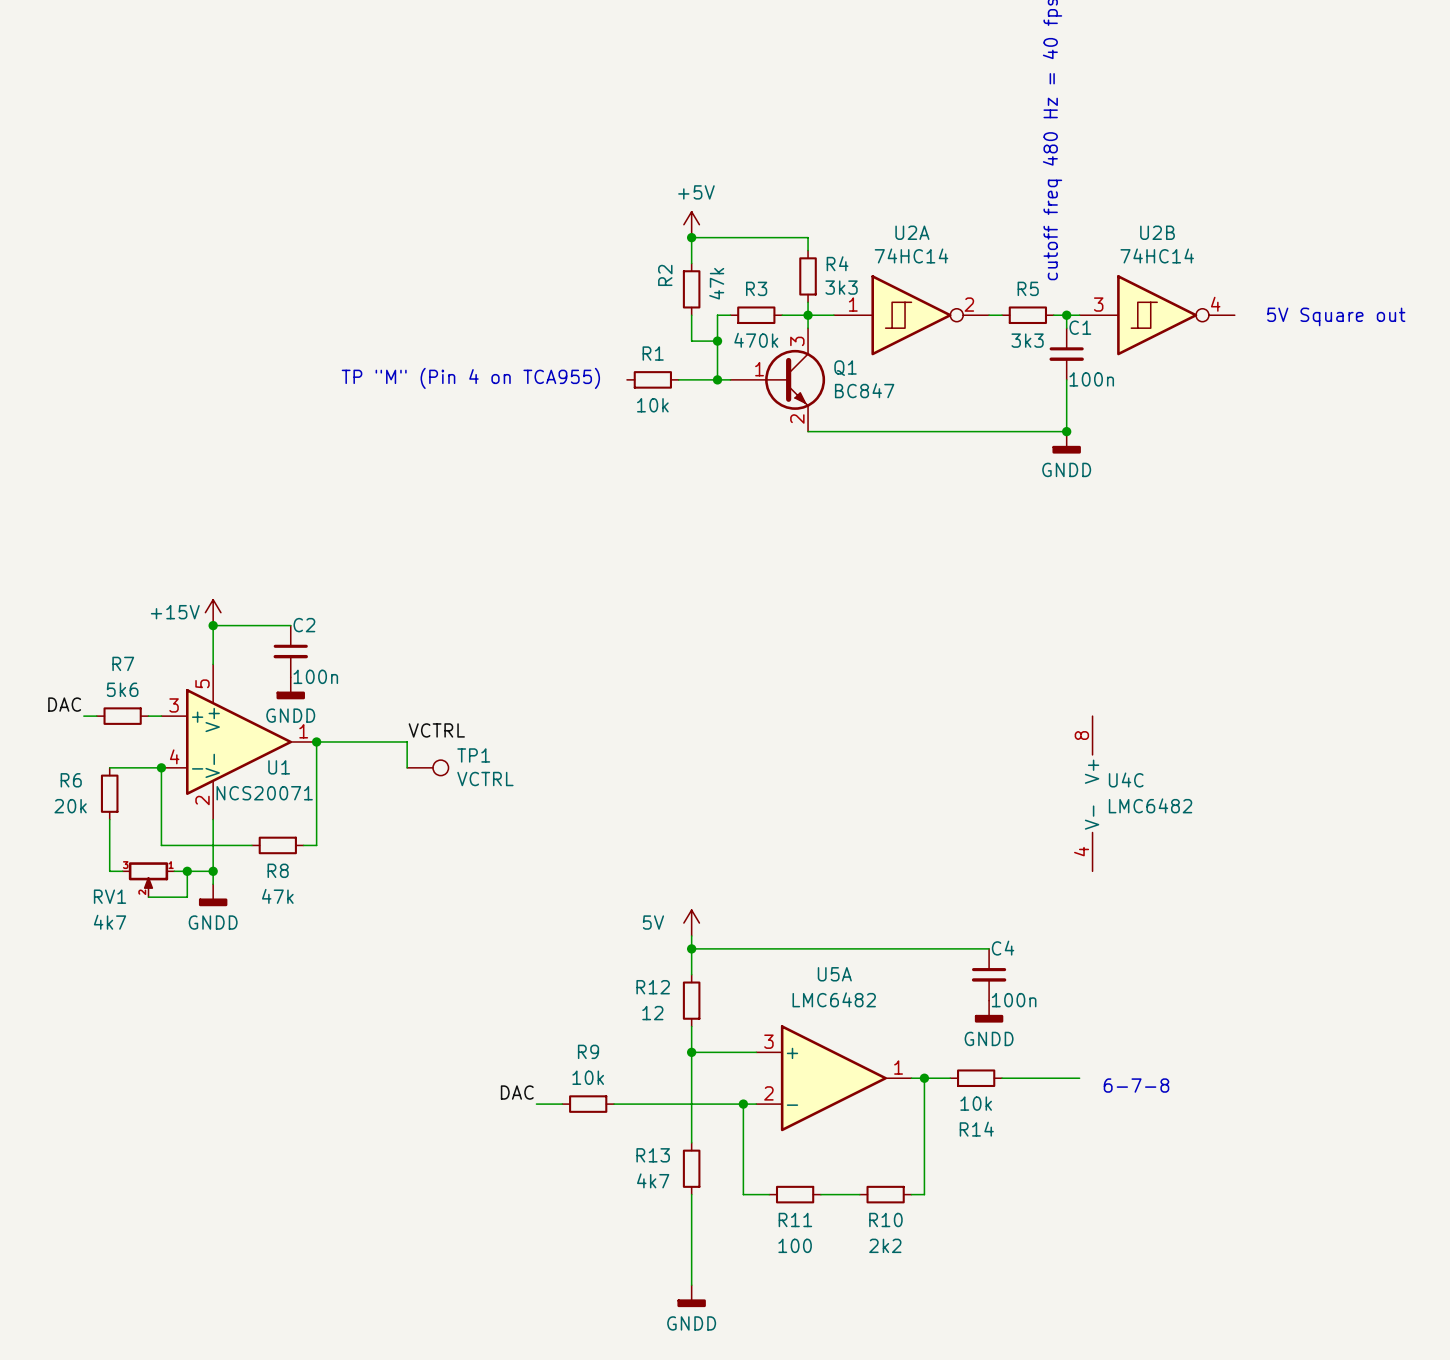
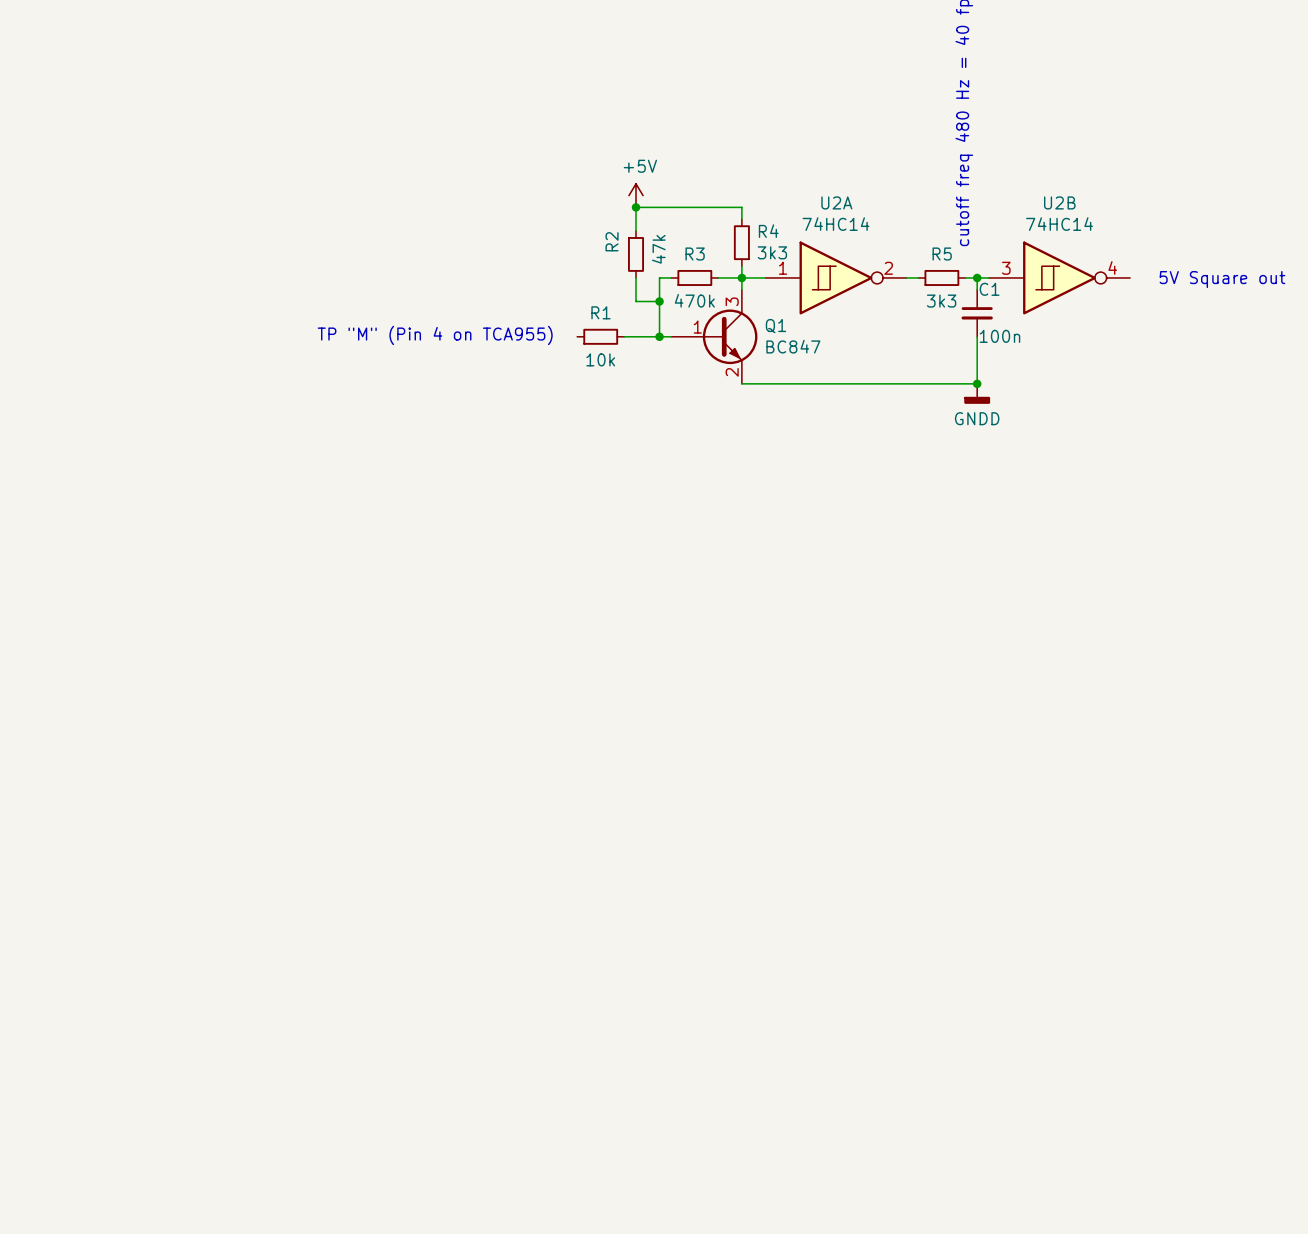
power symbol: +15V (213, 612) -> none
junction: (213, 625) -> none
wire: (290, 625) (213, 625) (213, 664) -> none
C2: 100n (290, 651) -> none
power symbol: GNDD (290, 688) -> none
label: DAC (64, 704) -> none
wire: (83, 716) (96, 716) -> none
R7: 5k6 (122, 716) -> none
wire: (148, 716) (161, 716) -> none
label: VCTRL (436, 730) -> none
U1: NCS20071 (239, 741) -> none
junction: (316, 741) -> none
wire: (109, 767) (161, 767) (161, 845) (251, 845) -> none
junction: (161, 767) -> none
wire: (407, 767) (407, 741) (316, 741) (316, 845) (303, 845) -> none
TP1: VCTRL (427, 767) -> none
R6: 20k (109, 793) -> none
U4C: LMC6482 (1092, 793) -> none
wire: (109, 819) (109, 871) (122, 871) -> none
wire: (213, 819) (213, 884) -> none
R8: 47k (277, 845) -> none
wire: (174, 871) (213, 871) -> none
wire: (187, 871) (187, 897) (148, 897) -> none
junction: (187, 871) -> none
junction: (213, 871) -> none
RV1: 4k7 (148, 879) -> none
power symbol: GNDD (213, 895) -> none
power symbol: 5V (691, 923) -> none
wire: (691, 935) (691, 974) -> none
wire: (691, 948) (989, 948) -> none
junction: (691, 948) -> none
C4: 100n (989, 974) -> none
R12: 12 (691, 1000) -> none
power symbol: GNDD (989, 1011) -> none
wire: (691, 1026) (691, 1142) -> none
wire: (691, 1052) (756, 1052) -> none
junction: (691, 1052) -> none
U5A: LMC6482 (833, 1078) -> none
wire: (911, 1078) (950, 1078) -> none
wire: (924, 1078) (924, 1194) (911, 1194) -> none
junction: (924, 1078) -> none
R14: 10k (976, 1078) -> none
wire: (1002, 1078) (1079, 1078) -> none
text: 6-7-8 (1136, 1085) -> none
label: DAC (517, 1092) -> none
wire: (536, 1104) (562, 1104) -> none
R9: 10k (588, 1104) -> none
wire: (614, 1104) (756, 1104) -> none
wire: (743, 1104) (743, 1194) (769, 1194) -> none
junction: (743, 1104) -> none
R13: 4k7 (691, 1168) -> none
wire: (691, 1194) (691, 1285) -> none
R11: 100 (795, 1194) -> none
wire: (820, 1194) (859, 1194) -> none
R10: 2k2 (885, 1194) -> none
power symbol: GNDD (691, 1296) -> none

